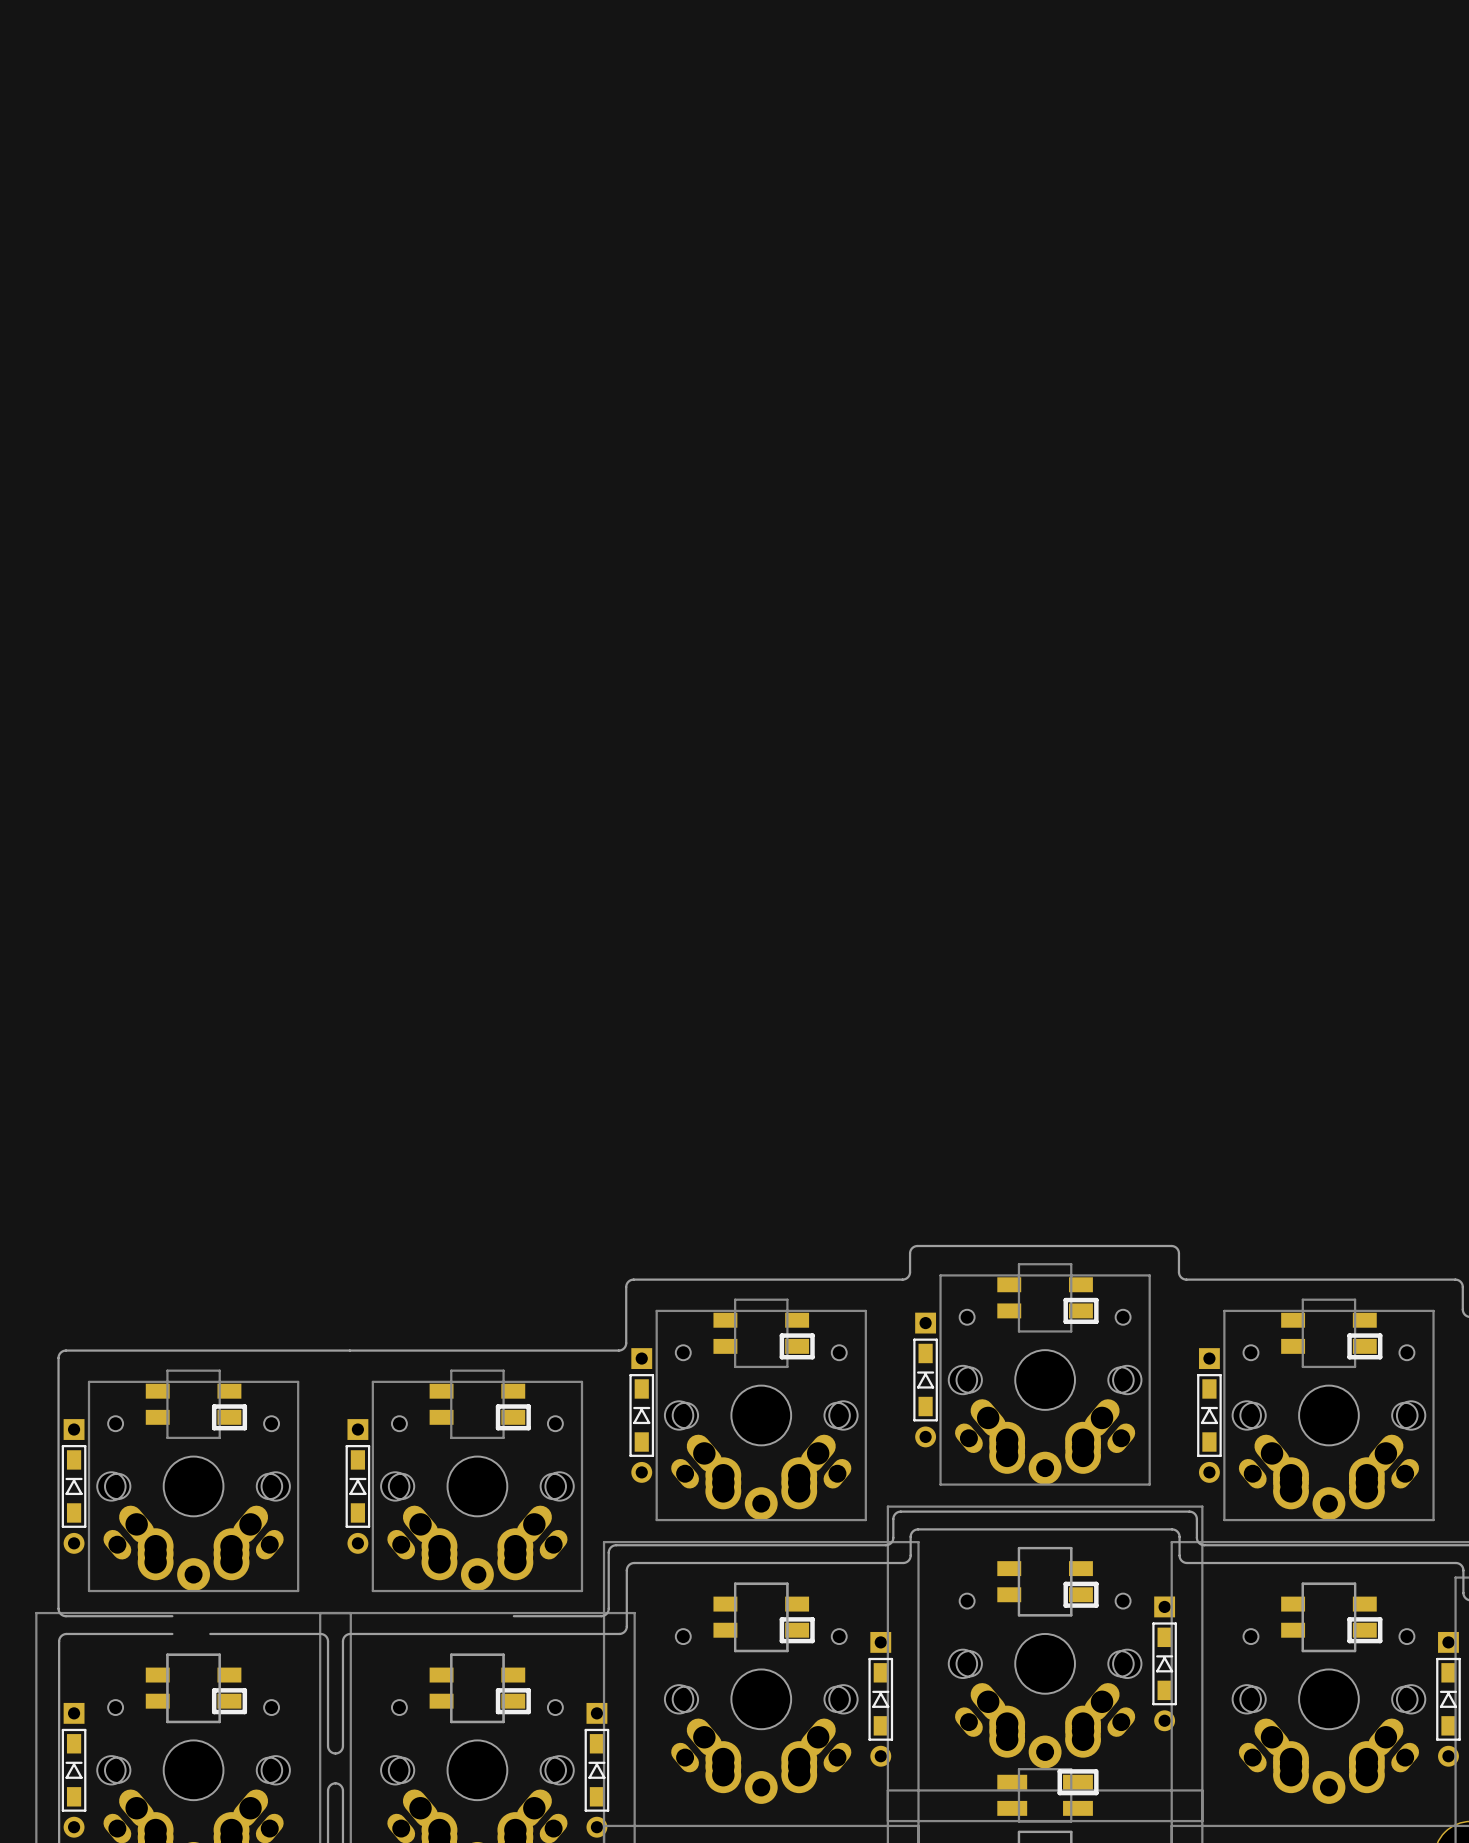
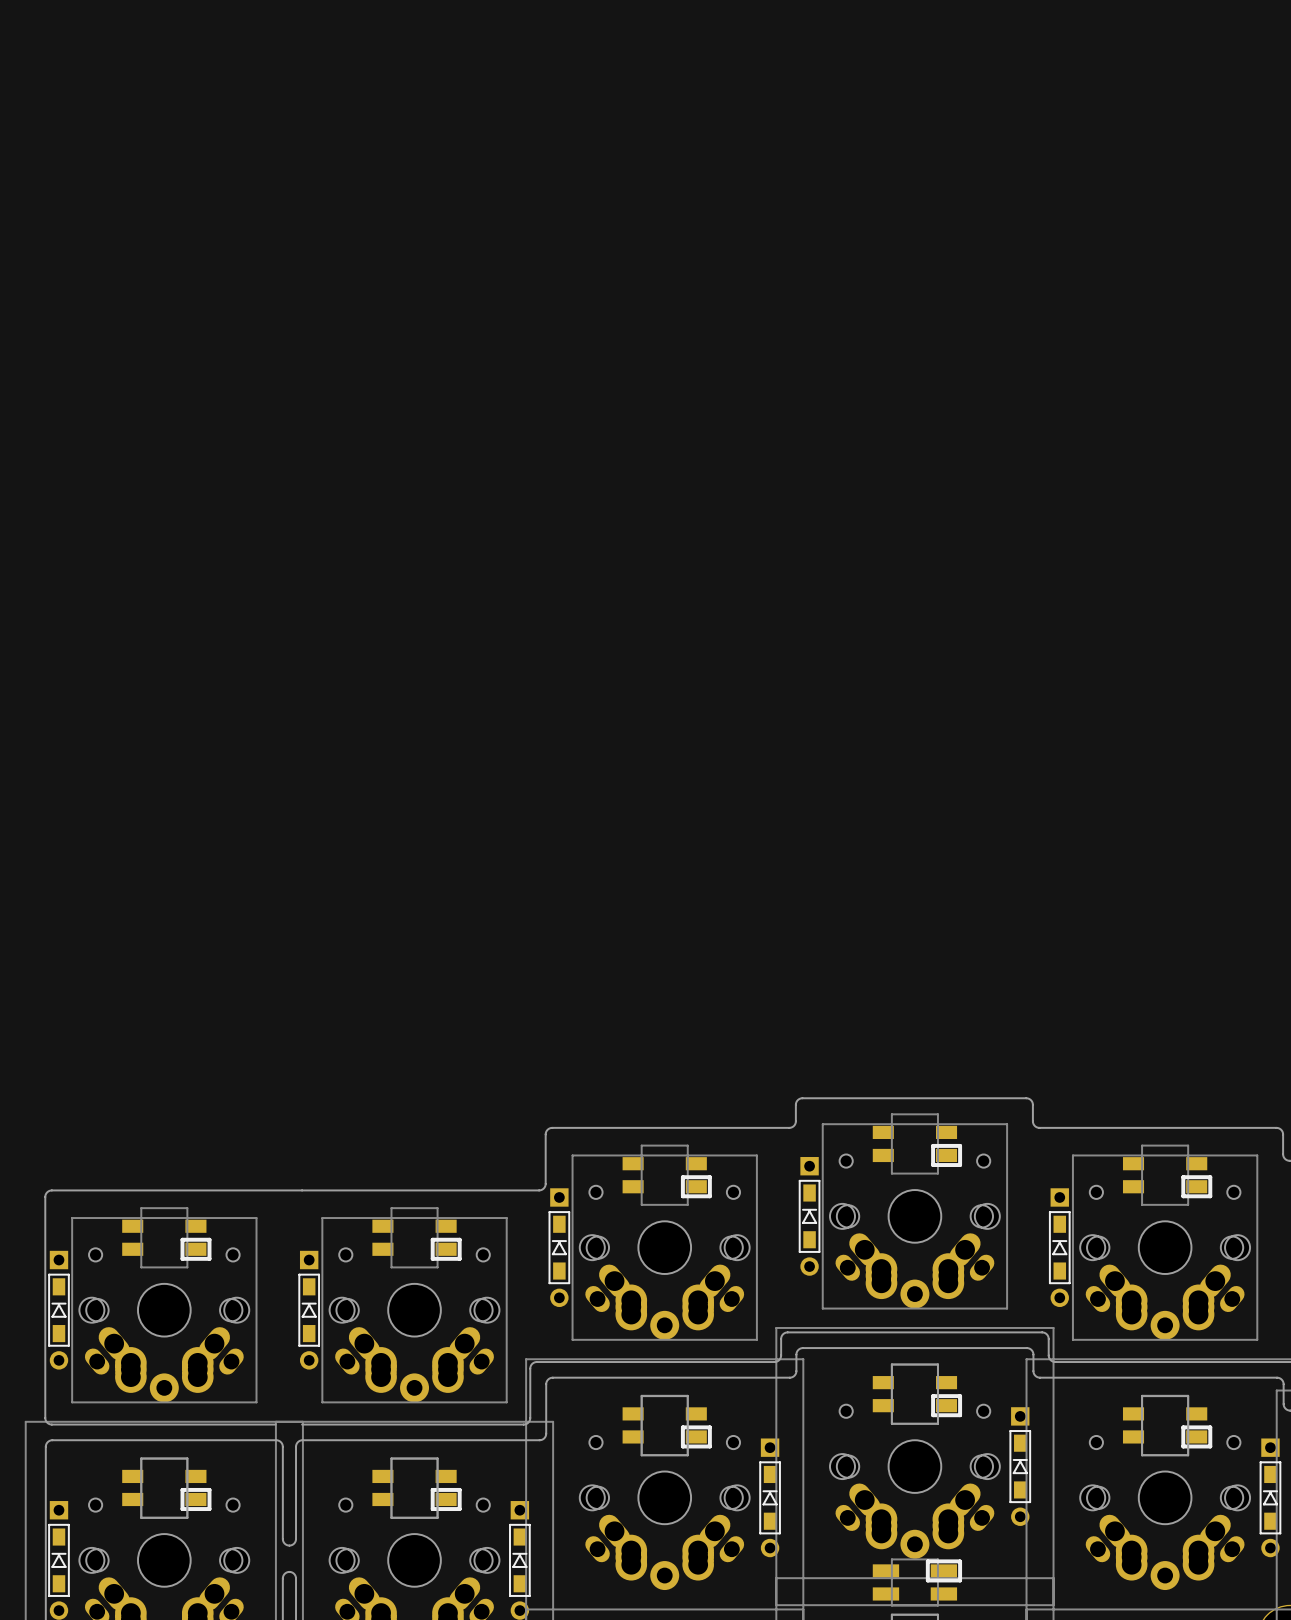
board edge: none -> (145, 1424) (275, 1424)
board edge: none -> (302, 1424) (446, 1424)
board edge: none -> (145, 1440) (179, 1440)

